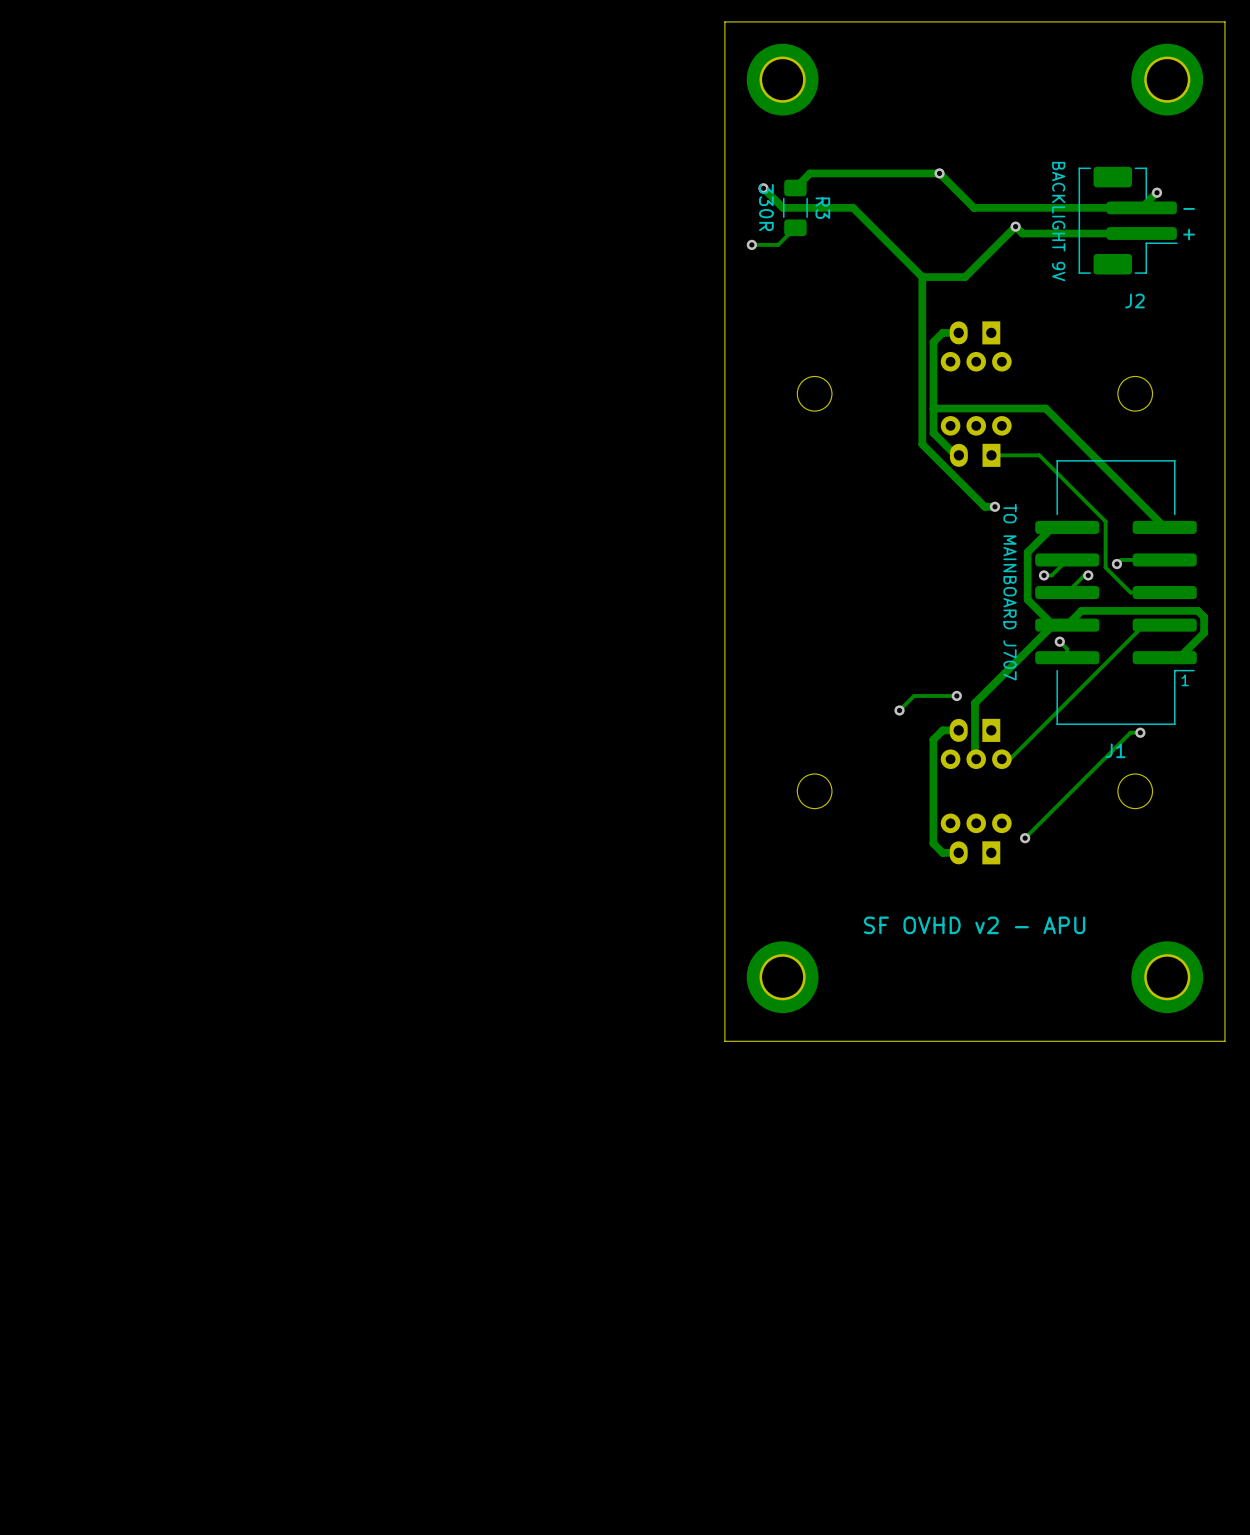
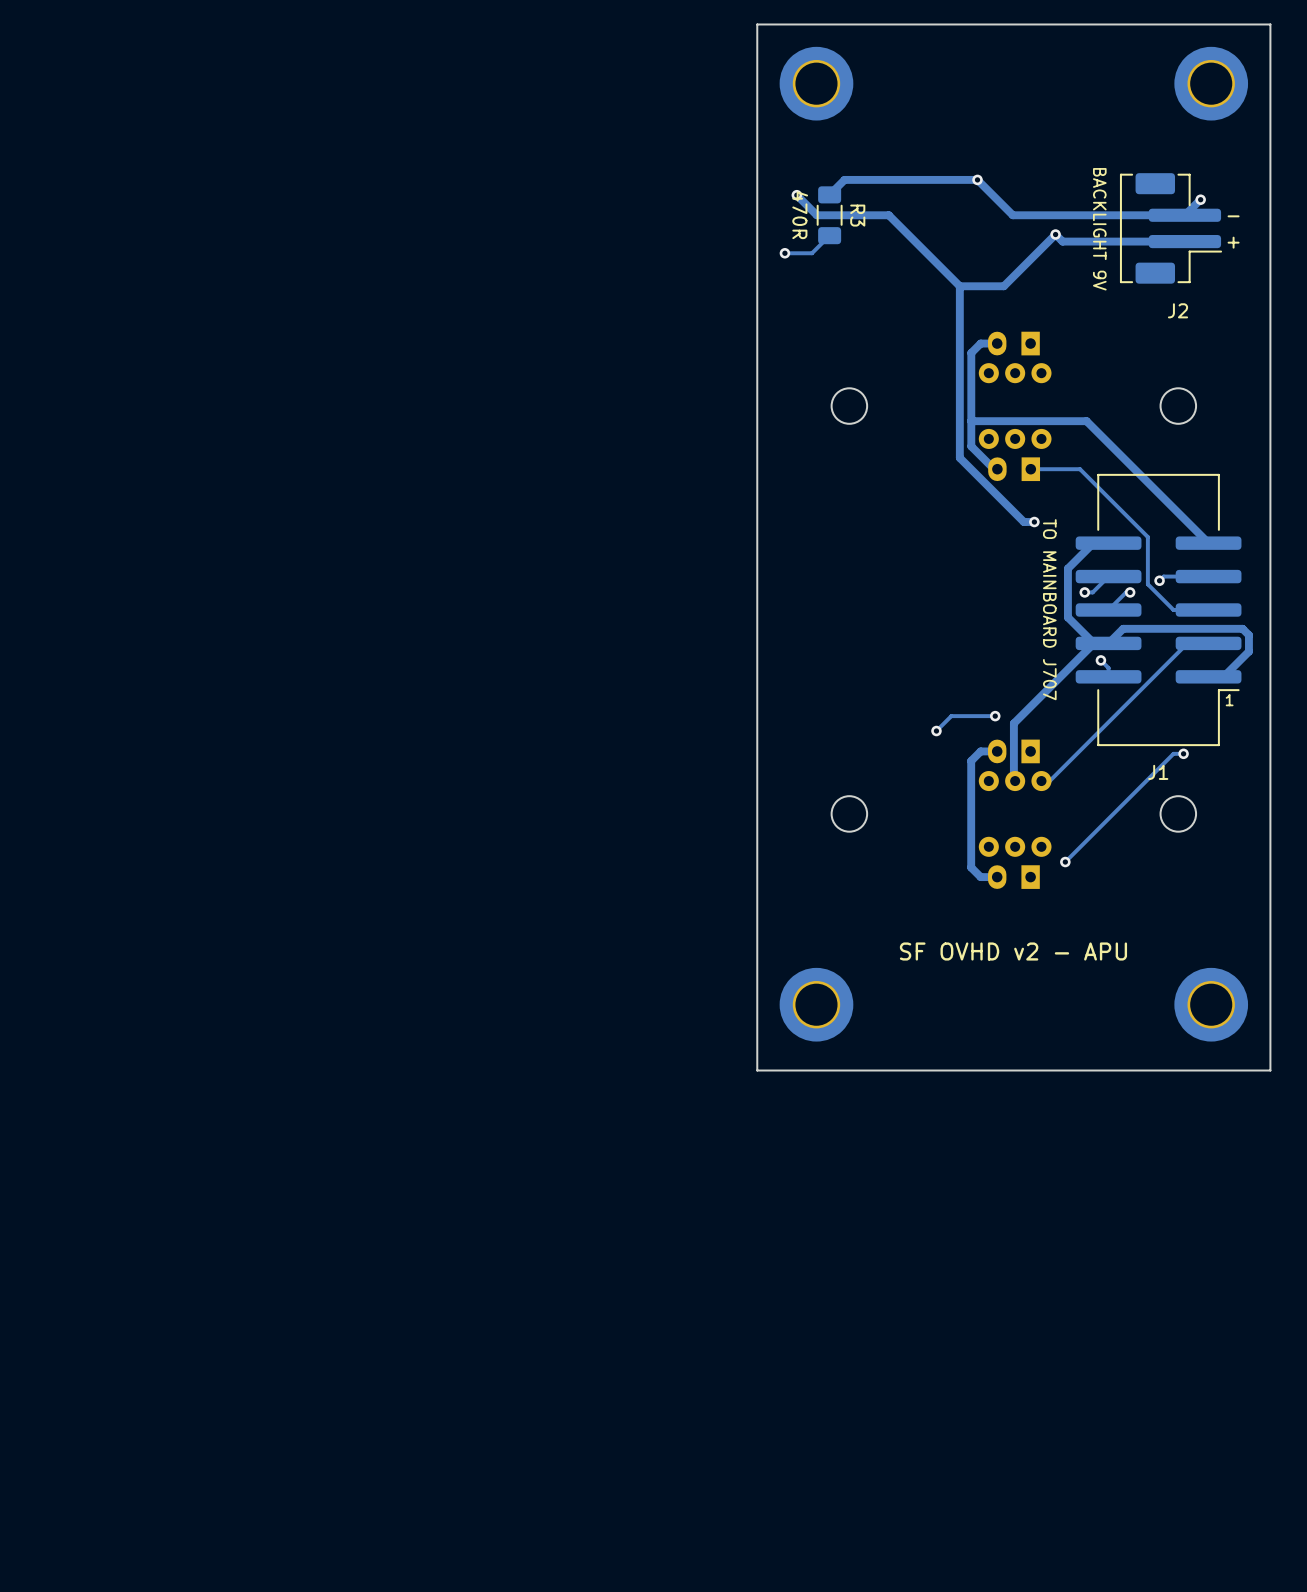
R3 text: 330R (766, 207) -> 470R (800, 215)

